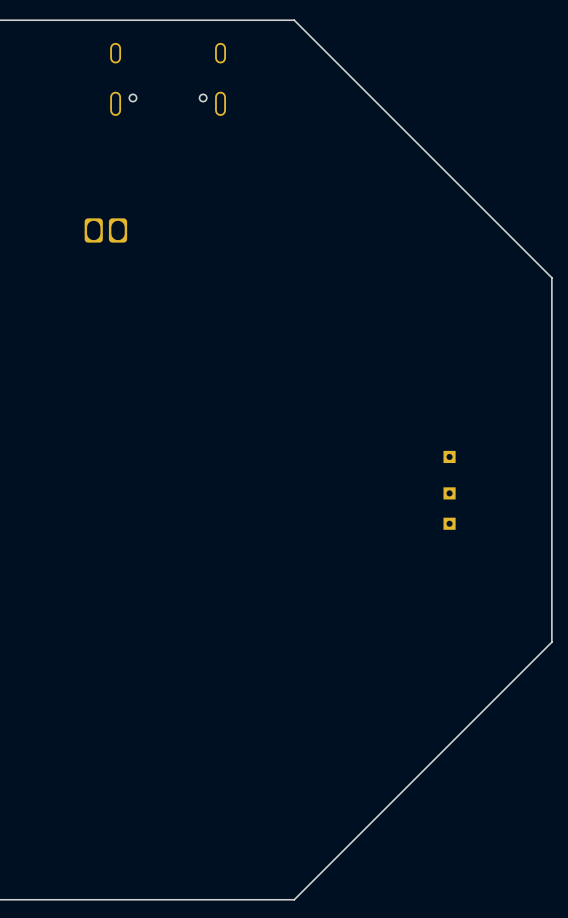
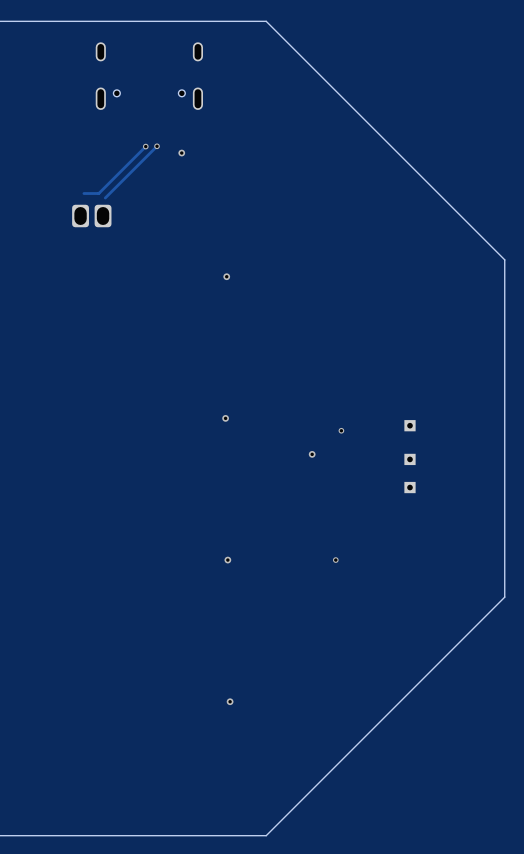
track: none -> (145, 146) (98, 193) (83, 193)
via: none -> (145, 146)
track: none -> (157, 146) (105, 198)
via: none -> (157, 146)
via: none -> (181, 153)
via: none -> (226, 276)
via: none -> (225, 418)
via: none -> (341, 430)
via: none -> (312, 454)
via: none -> (227, 560)
via: none -> (335, 560)
via: none -> (230, 701)

